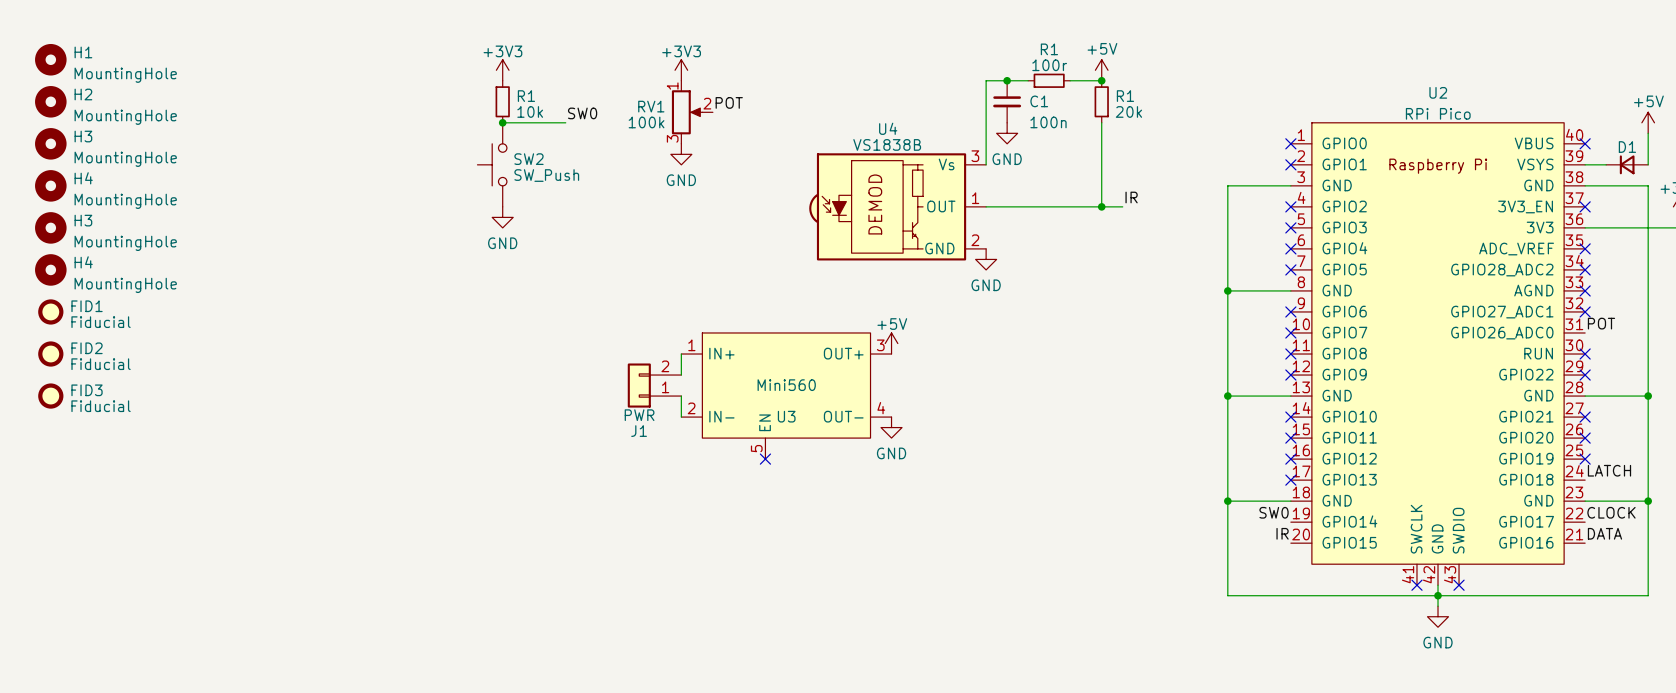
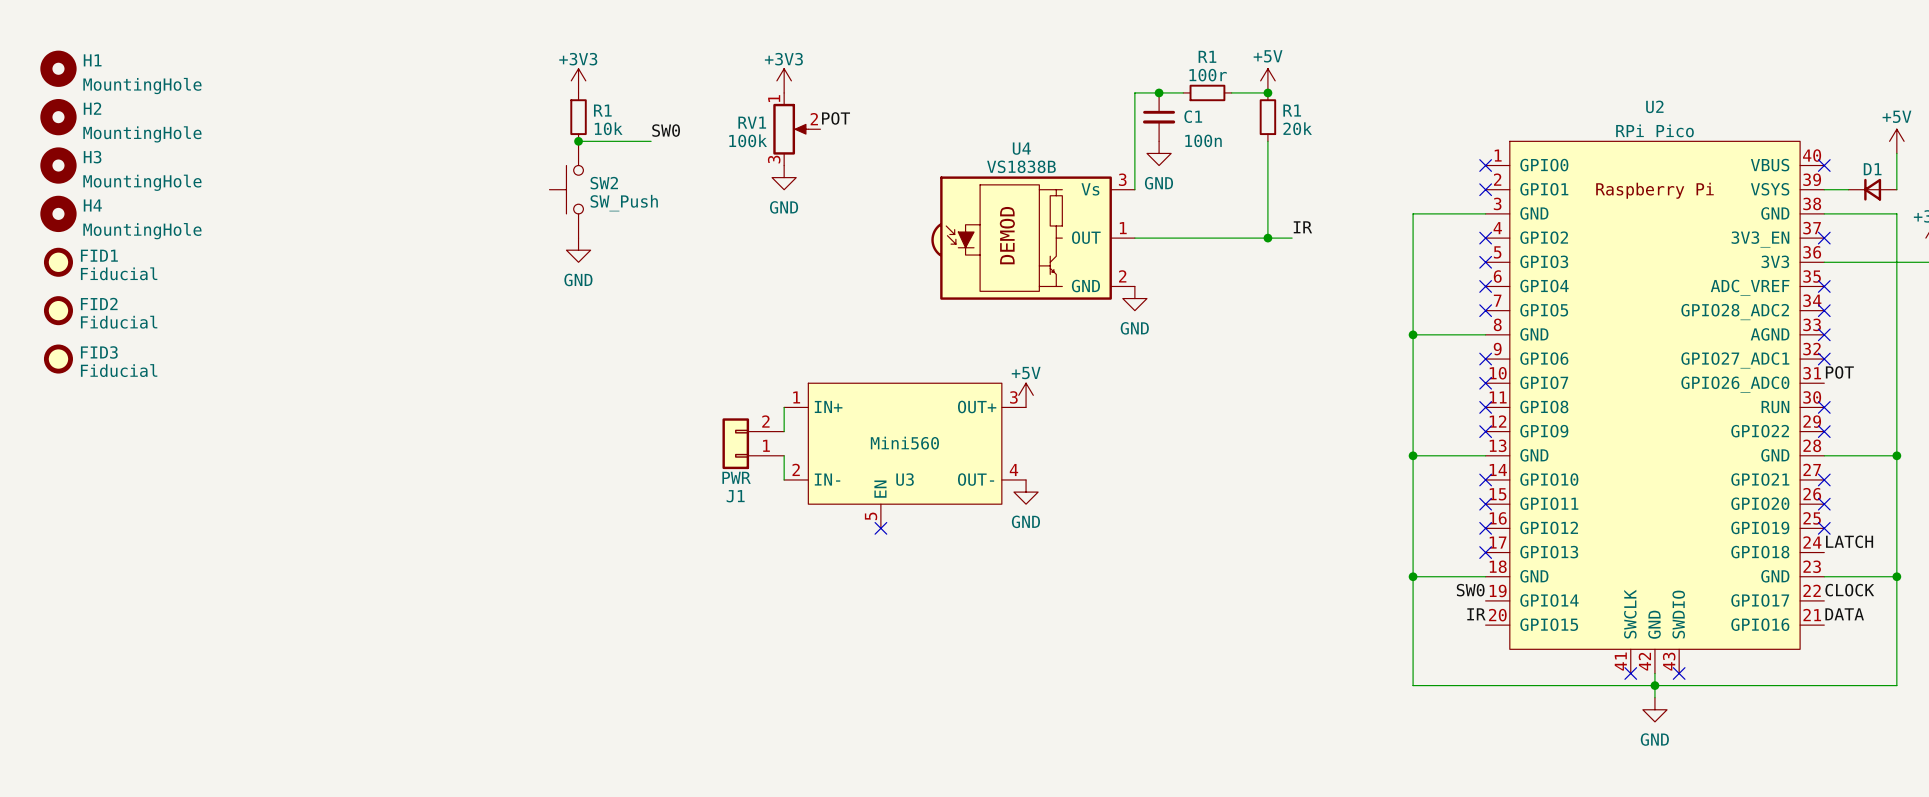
H3: MountingHole (50, 227) -> none
FID1: none -> Fiducial (58, 262)
H4: MountingHole (50, 269) -> none
FID1 name: FID1 (87, 306) -> FID3 (99, 352)
FID2 position: (50, 354) -> (58, 310)
FID3: Fiducial (50, 396) -> none

